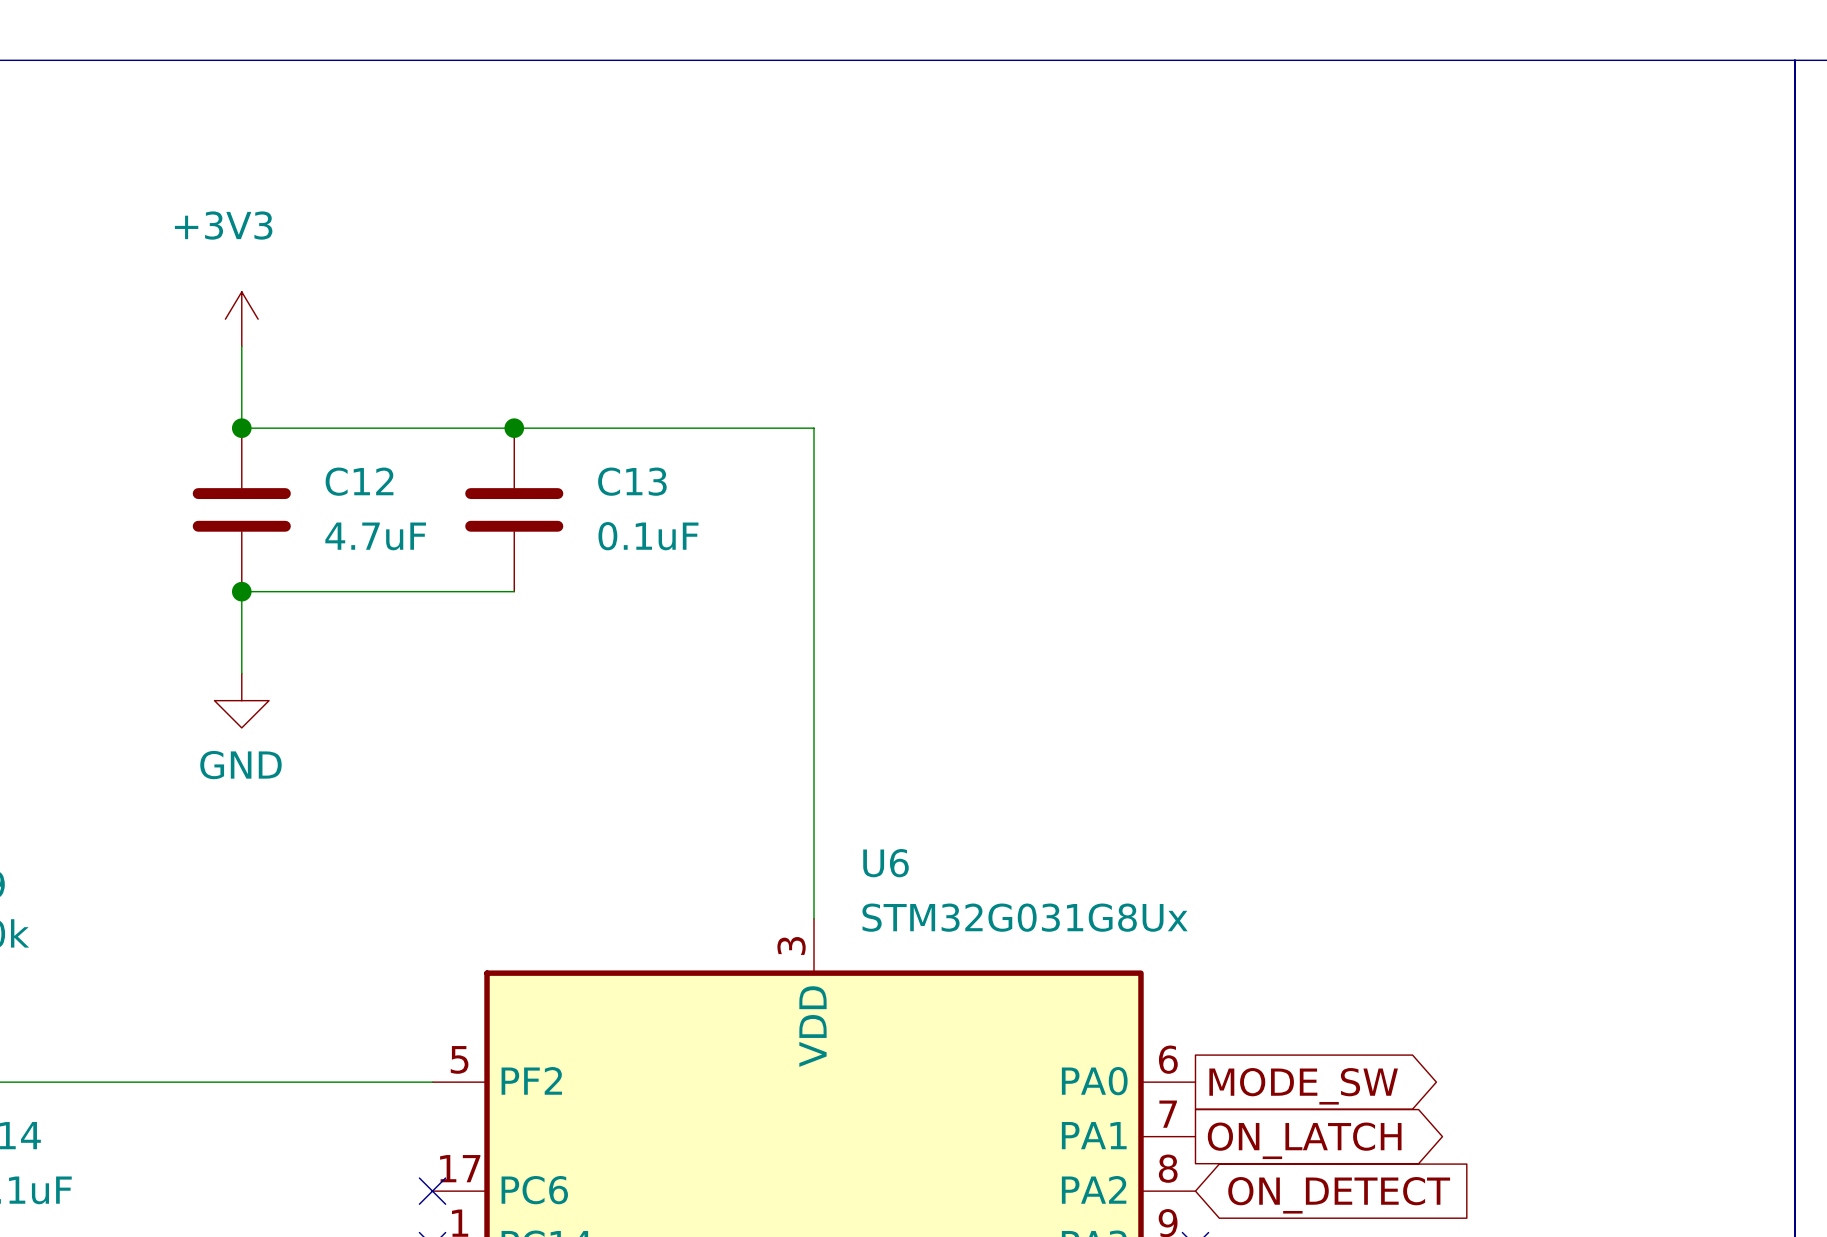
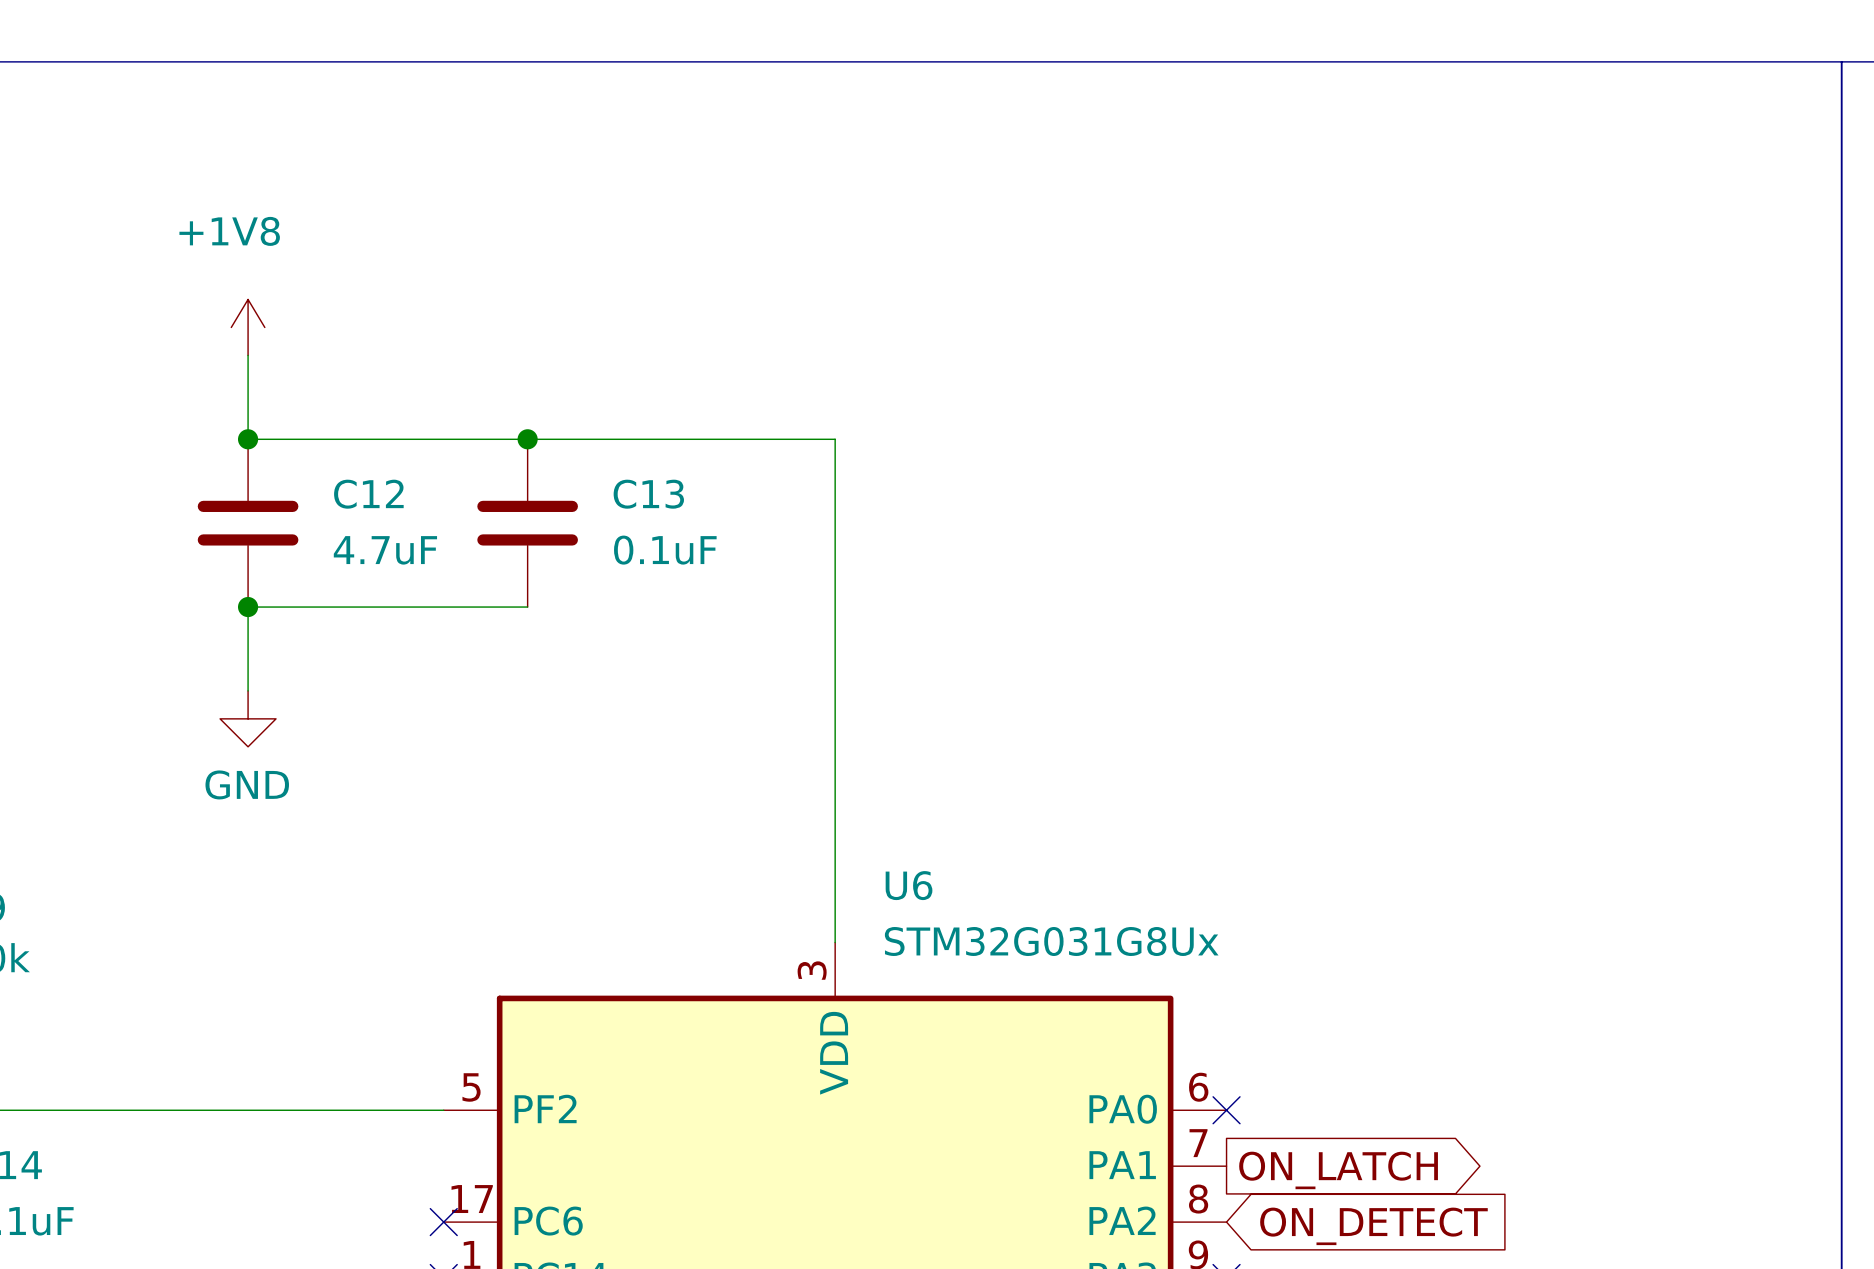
power symbol: +3V3 (241, 319) -> +1V8 (248, 327)
no-connect mark: none -> (1226, 1110)
global label: MODE_SW (1303, 1086) -> none

